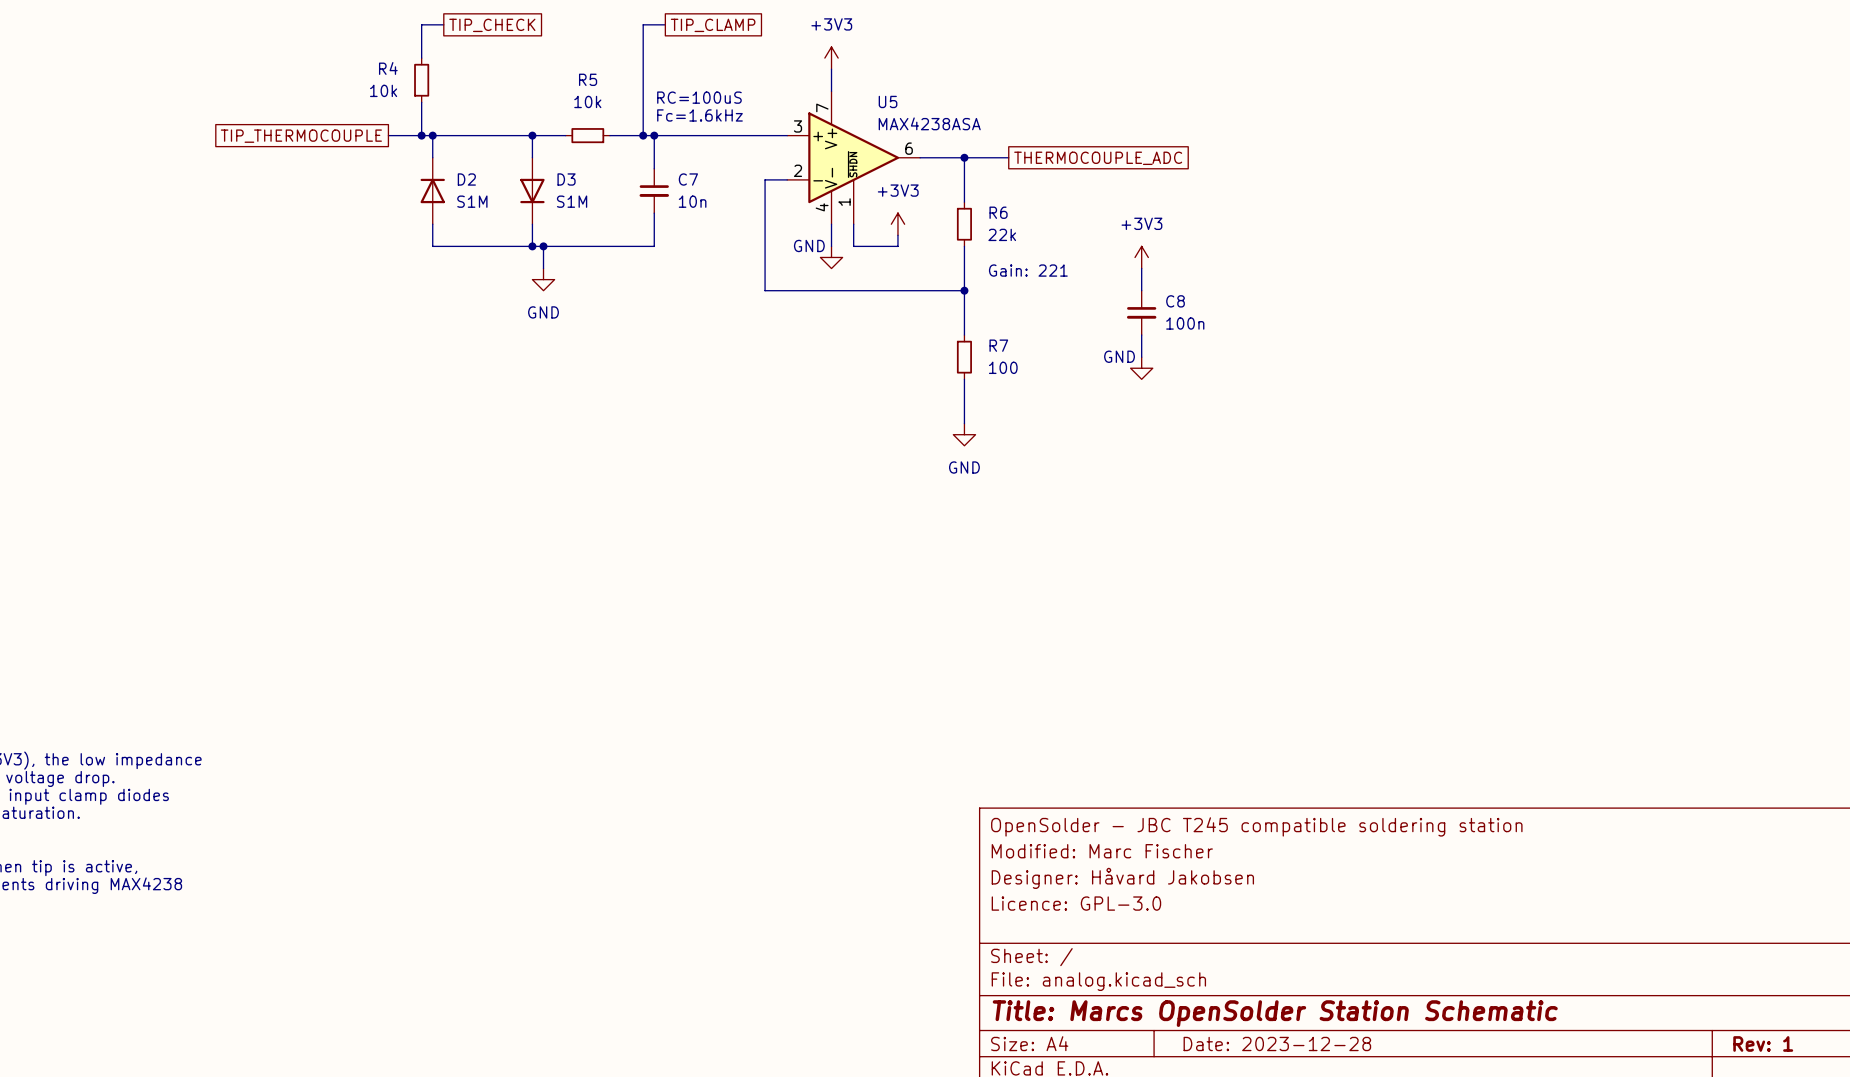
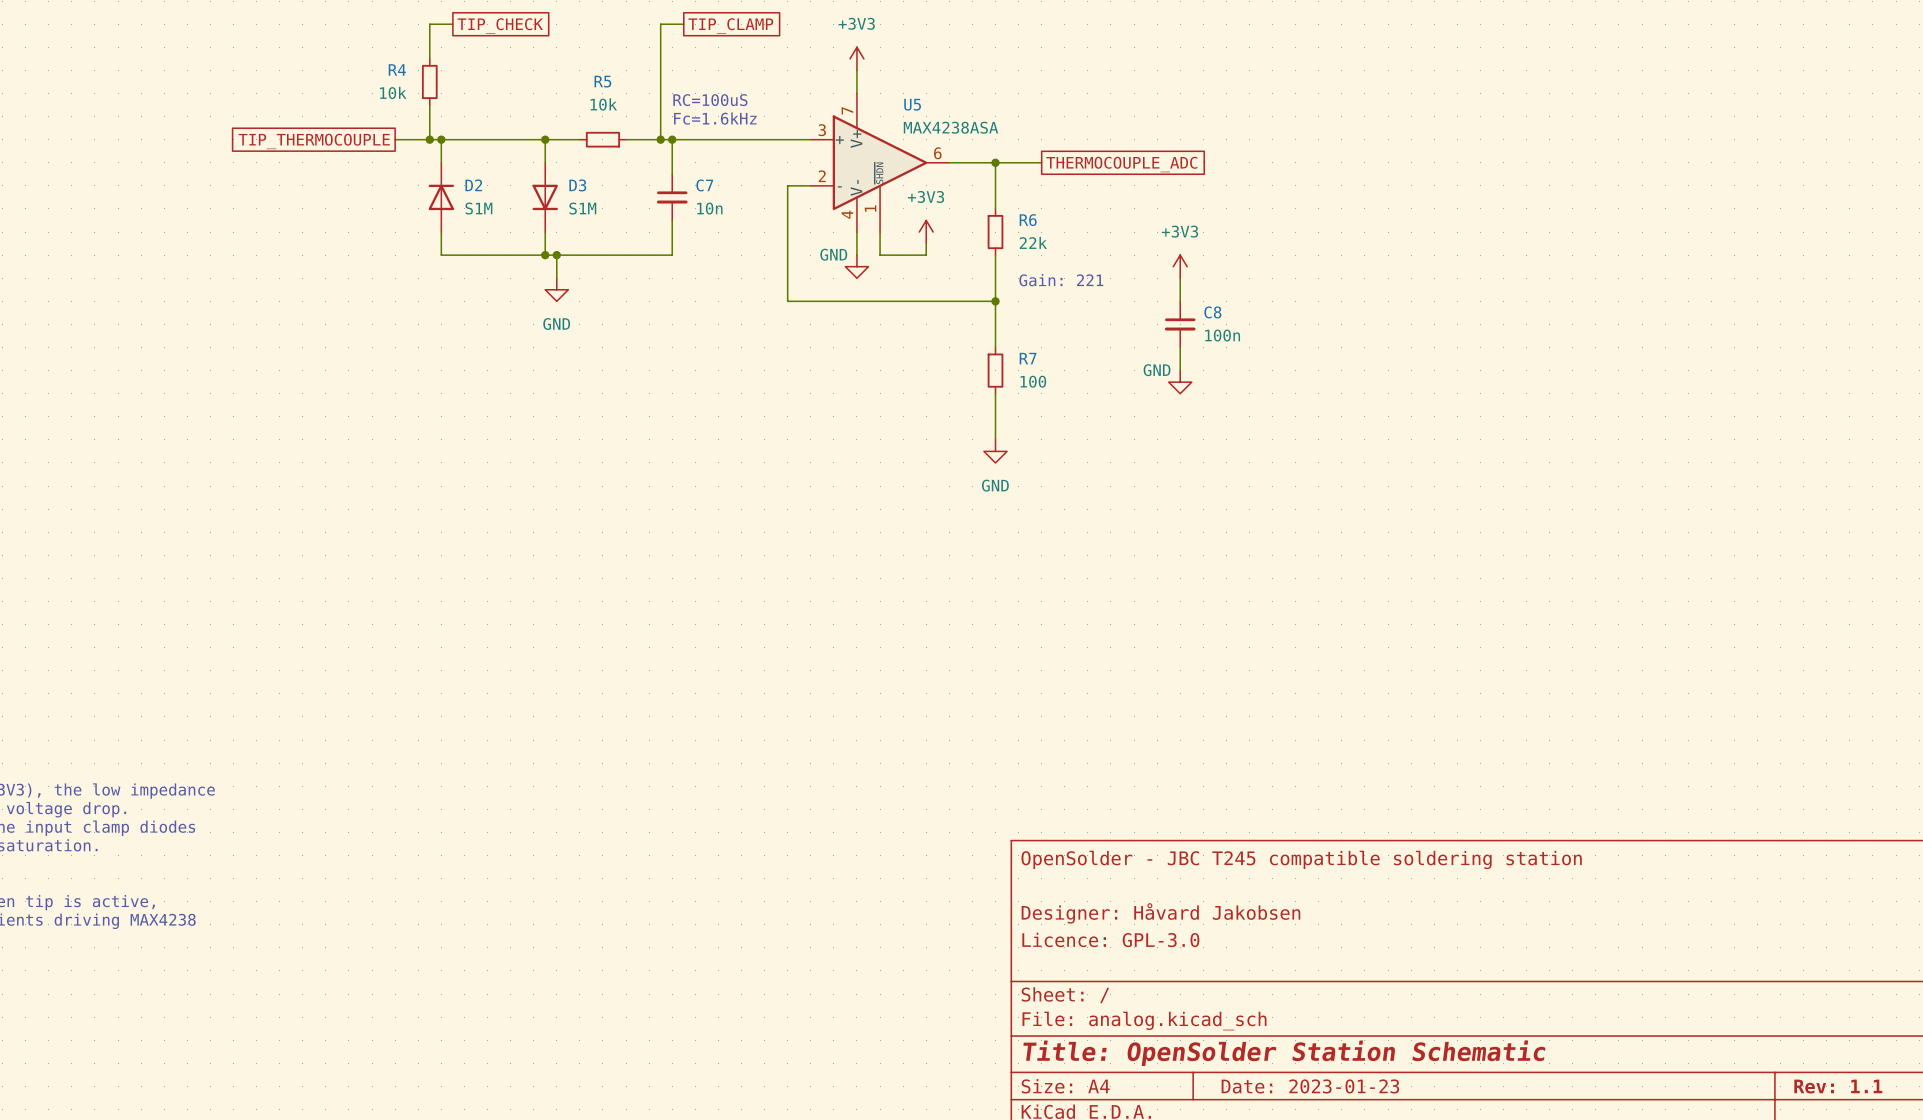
title block: Modified: Marc Fischer (1102, 851) -> none
title block: Title: Marcs OpenSolder Station Schematic (1275, 1013) -> Title: OpenSolder Station Schematic (1284, 1053)
title block: Date: 2023-12-28 (1277, 1043) -> Date: 2023-01-23 (1310, 1086)
title block: Rev: 1 (1763, 1043) -> Rev: 1.1 (1838, 1086)

